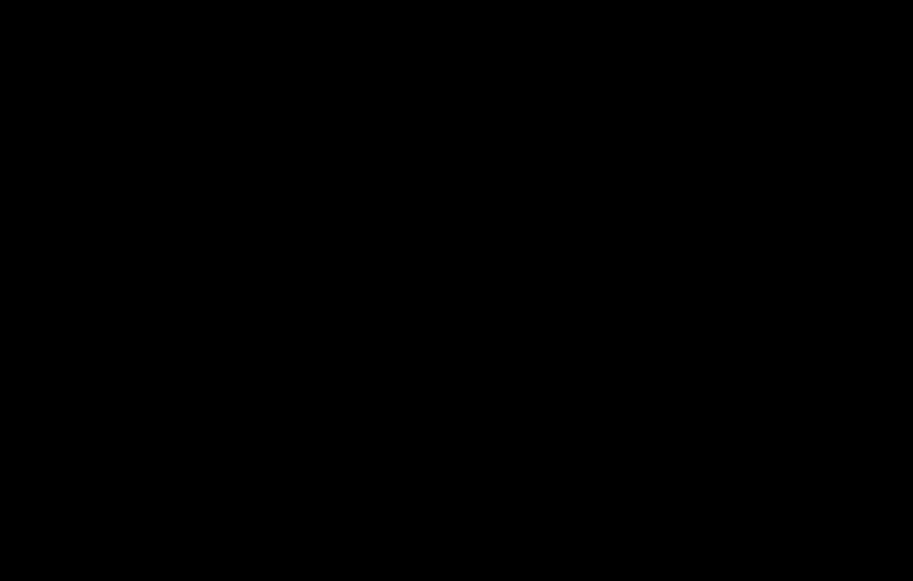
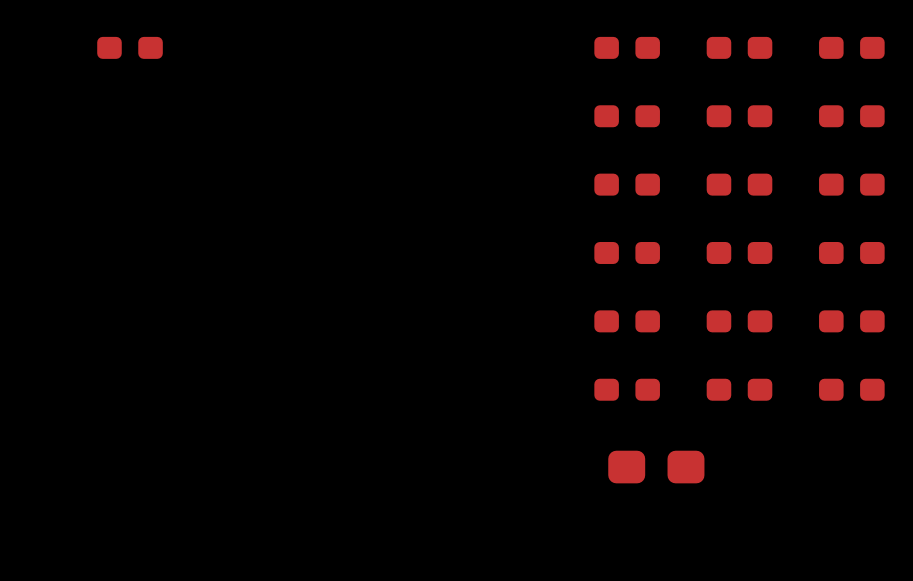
part: none -> (130, 47)
part: none -> (627, 47)
part: none -> (739, 47)
part: none -> (851, 47)
part: none -> (627, 116)
part: none -> (739, 116)
part: none -> (851, 116)
part: none -> (627, 184)
part: none -> (739, 184)
part: none -> (851, 184)
part: none -> (627, 252)
part: none -> (739, 252)
part: none -> (851, 252)
part: none -> (627, 321)
part: none -> (739, 321)
part: none -> (851, 321)
part: none -> (627, 389)
part: none -> (739, 389)
part: none -> (851, 389)
part: none -> (656, 467)

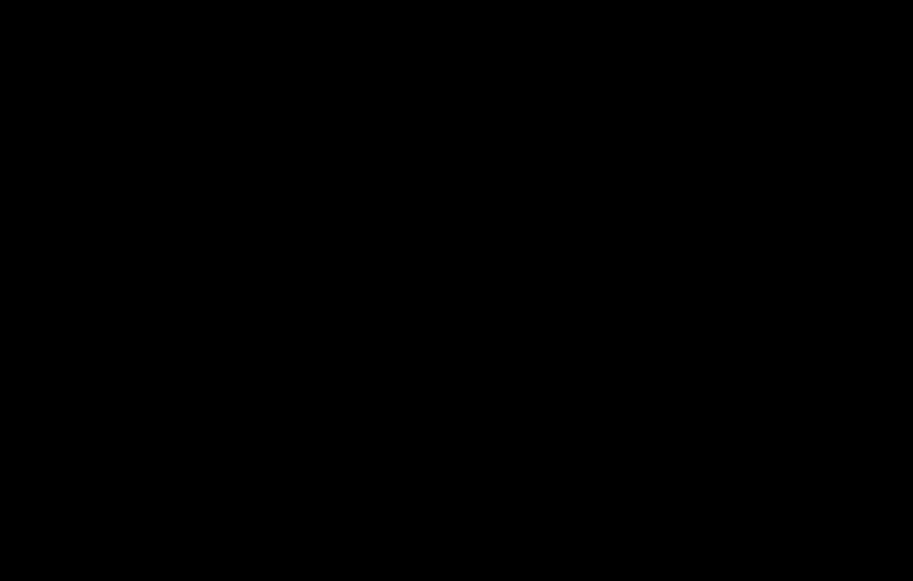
part: (130, 47) -> none
part: (627, 47) -> none
part: (739, 47) -> none
part: (851, 47) -> none
part: (627, 116) -> none
part: (739, 116) -> none
part: (851, 116) -> none
part: (627, 184) -> none
part: (739, 184) -> none
part: (851, 184) -> none
part: (627, 252) -> none
part: (739, 252) -> none
part: (851, 252) -> none
part: (627, 321) -> none
part: (739, 321) -> none
part: (851, 321) -> none
part: (627, 389) -> none
part: (739, 389) -> none
part: (851, 389) -> none
part: (656, 467) -> none

